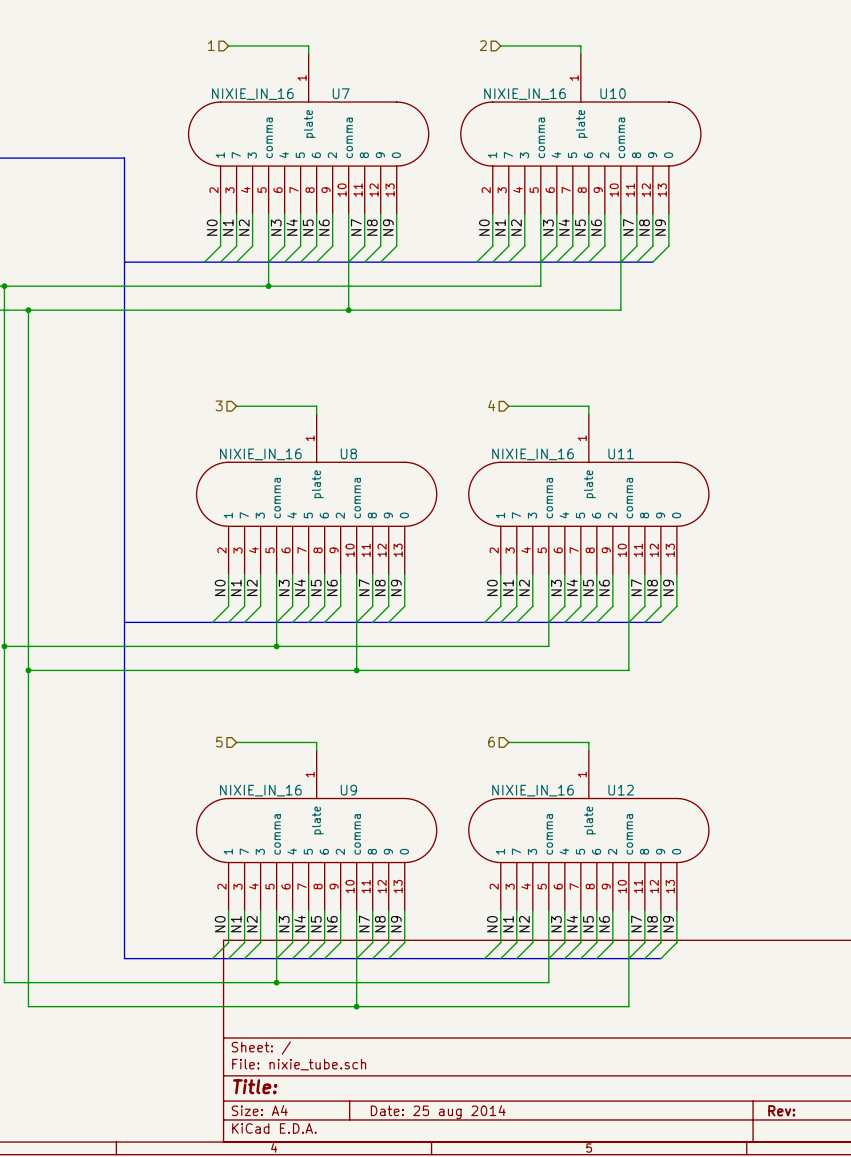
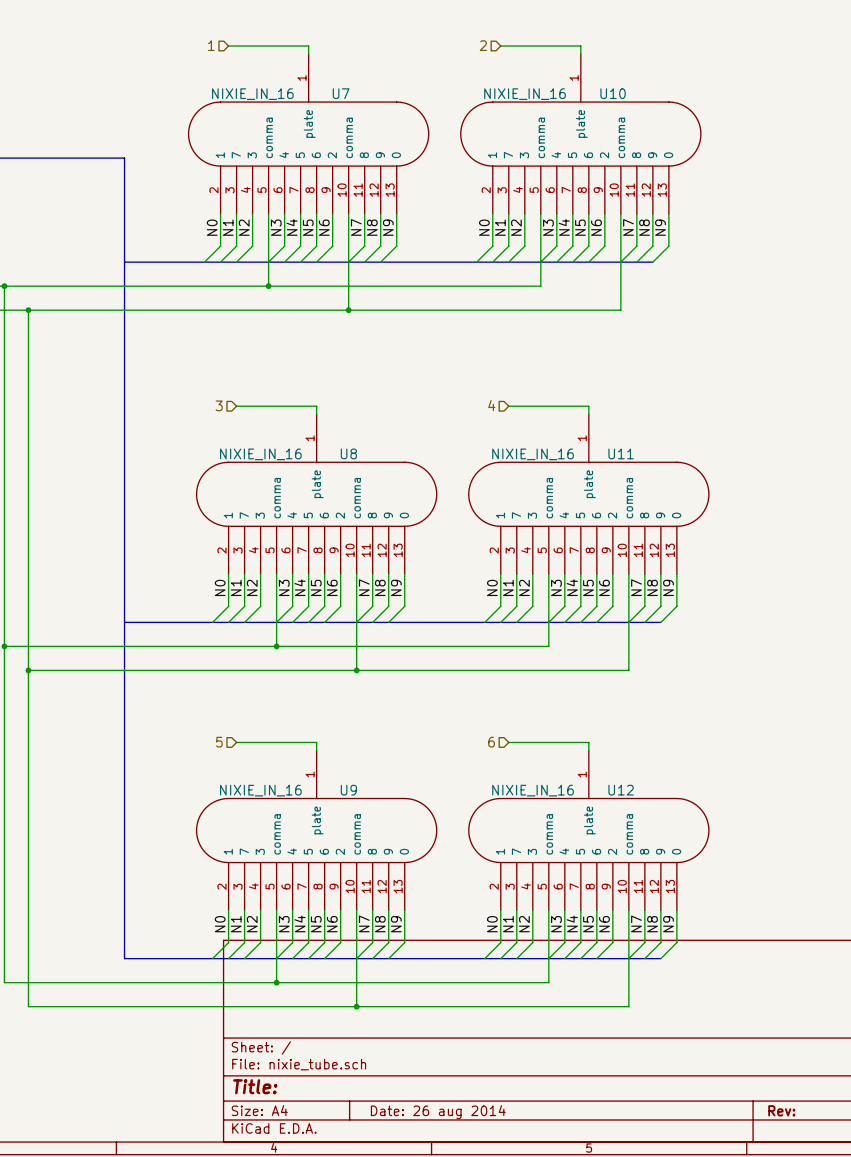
title block: Date: 25 aug 2014 (438, 1112) -> Date: 26 aug 2014 (438, 1112)

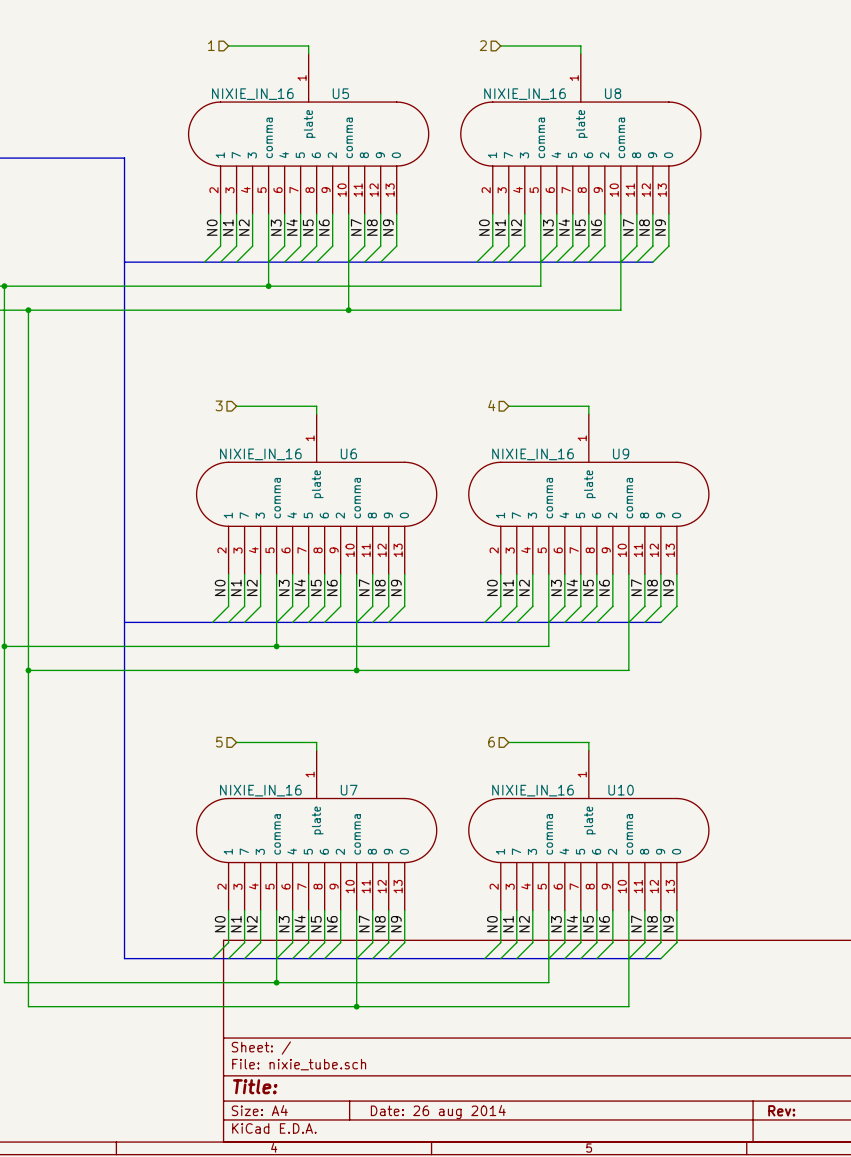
U7 name: U7 (341, 93) -> U5 (340, 93)
U10 name: U10 (613, 93) -> U8 (613, 93)
U8 name: U8 (348, 453) -> U6 (348, 453)
U11 name: U11 (621, 453) -> U9 (621, 453)
U9 name: U9 (348, 790) -> U7 (349, 790)
U12 name: U12 (621, 790) -> U10 (621, 790)

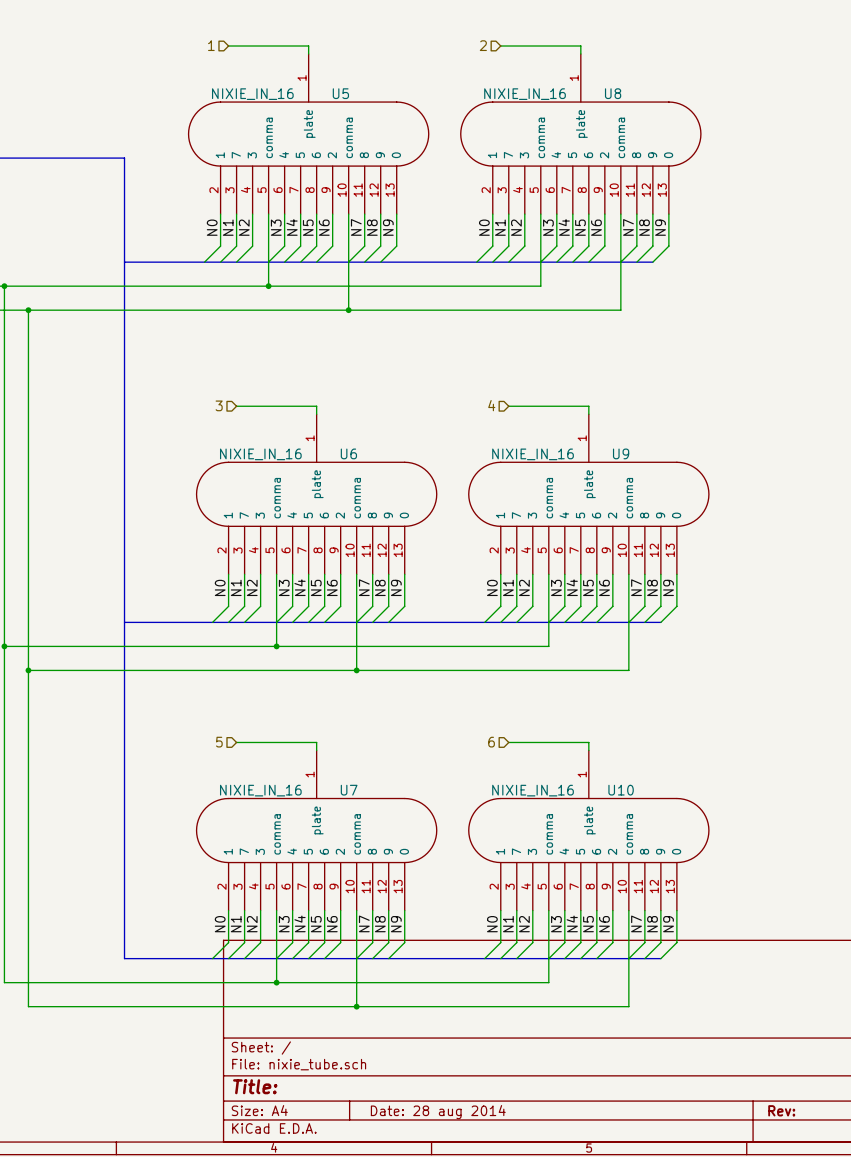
title block: Date: 26 aug 2014 (438, 1112) -> Date: 28 aug 2014 (438, 1112)

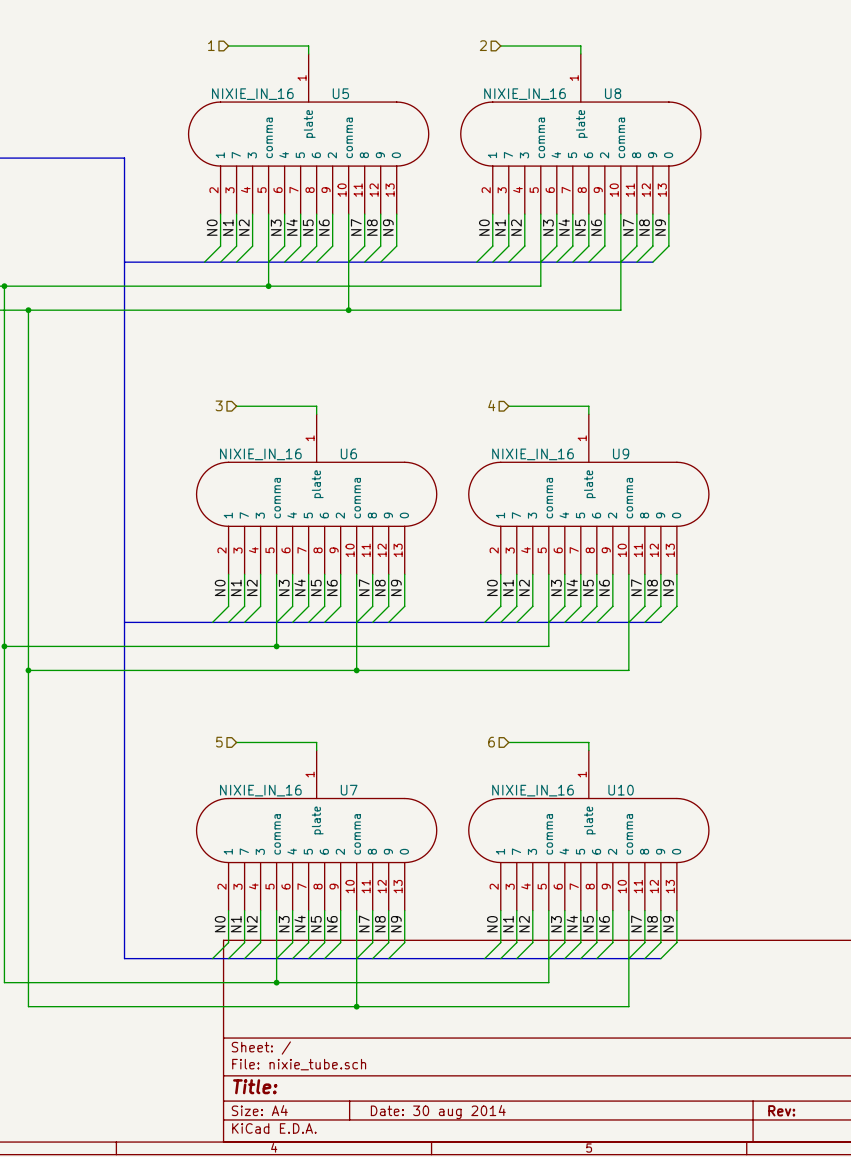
title block: Date: 28 aug 2014 (438, 1112) -> Date: 30 aug 2014 (438, 1112)

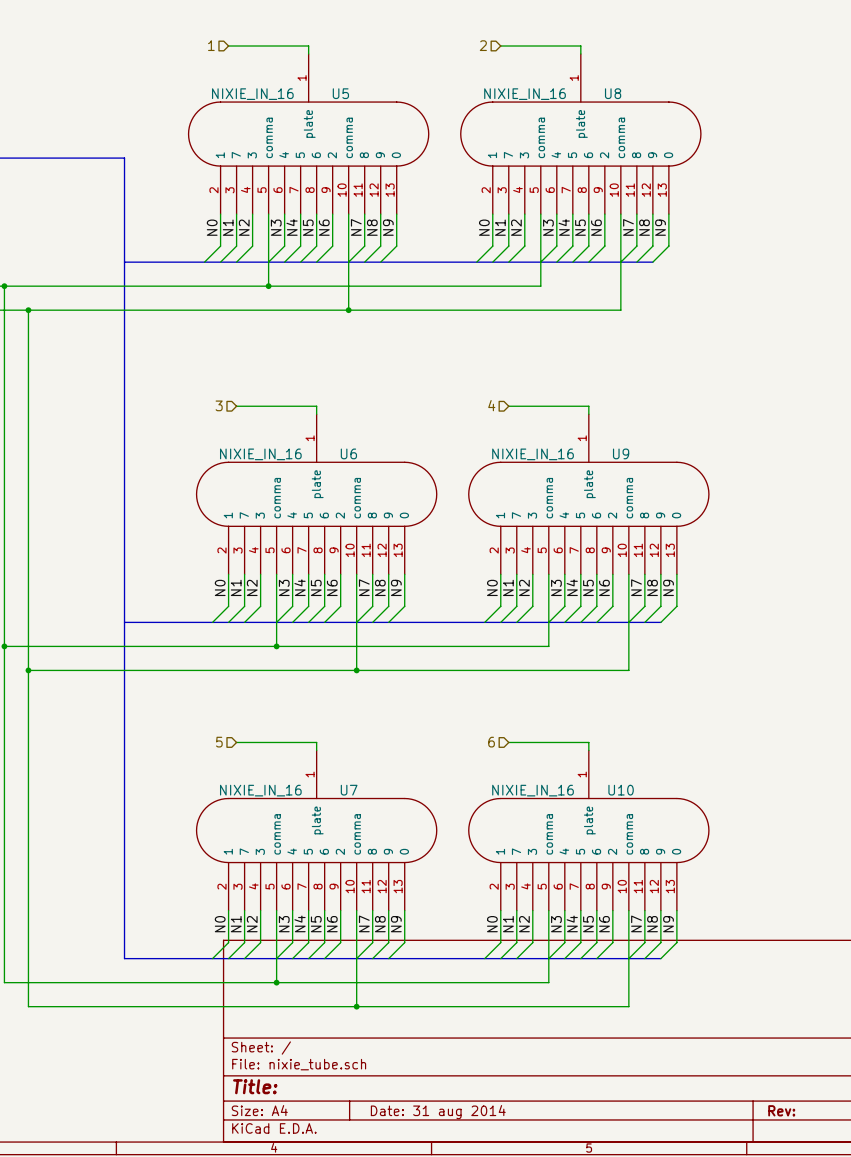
title block: Date: 30 aug 2014 (438, 1112) -> Date: 31 aug 2014 (438, 1112)

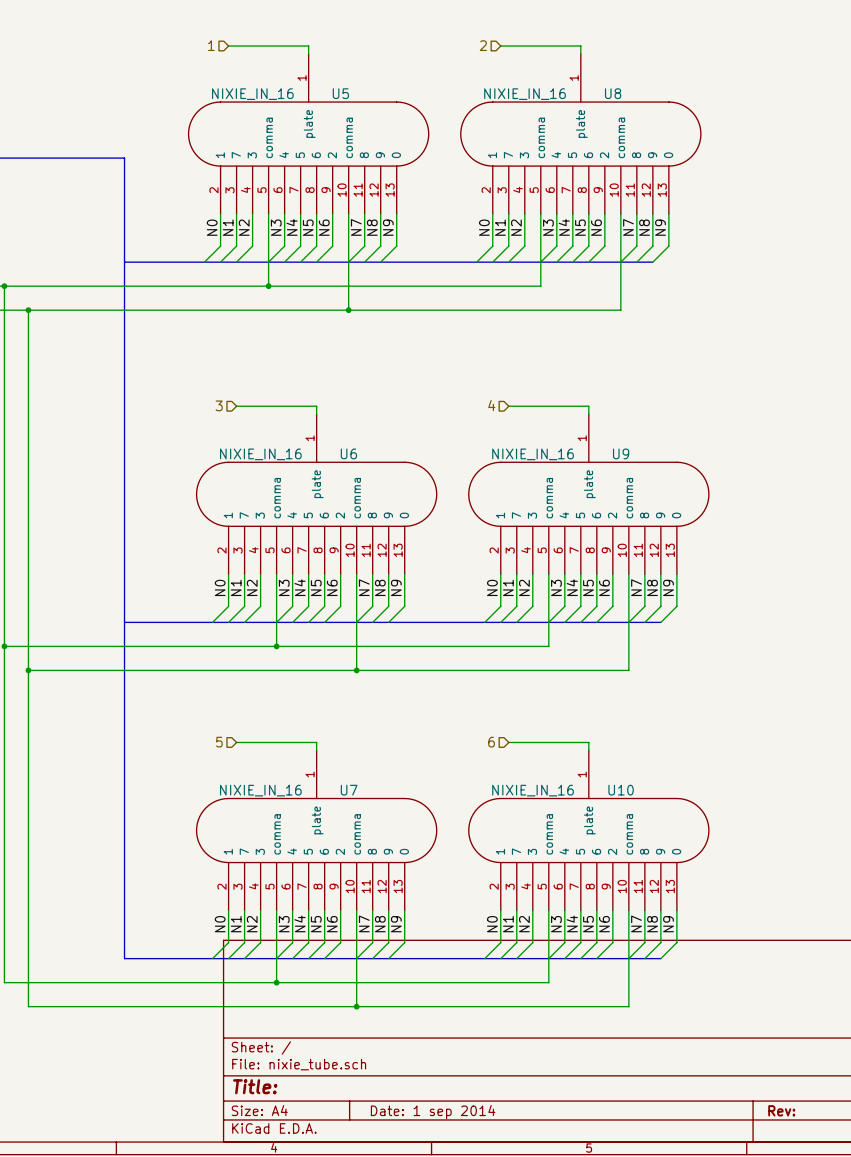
title block: Date: 31 aug 2014 (438, 1112) -> Date: 1 sep 2014 (433, 1112)

